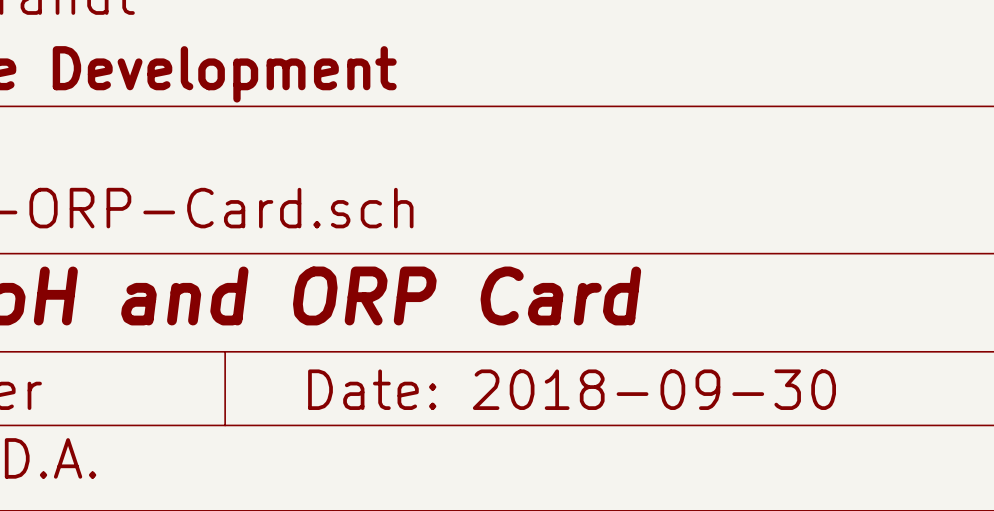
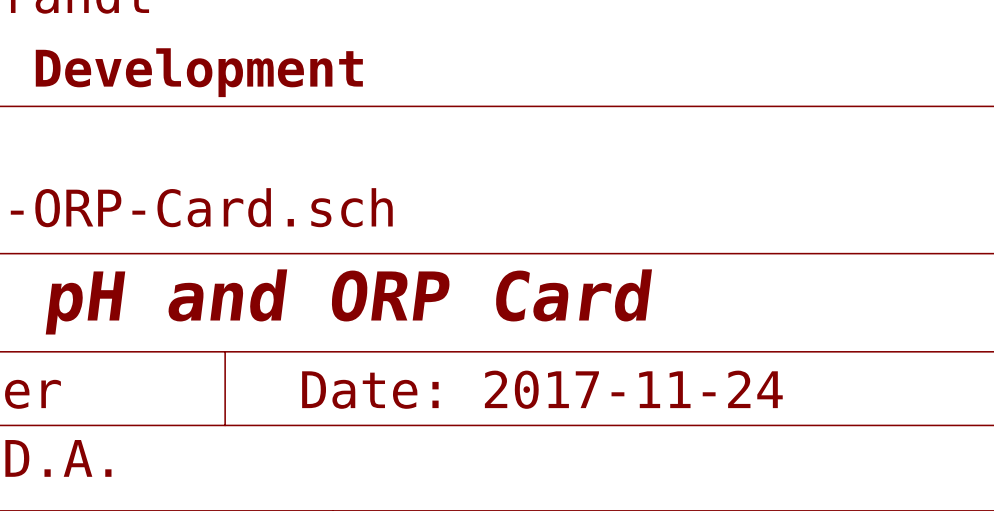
title block: Date: 2018-09-30 (572, 389) -> Date: 2017-11-24 (542, 389)

